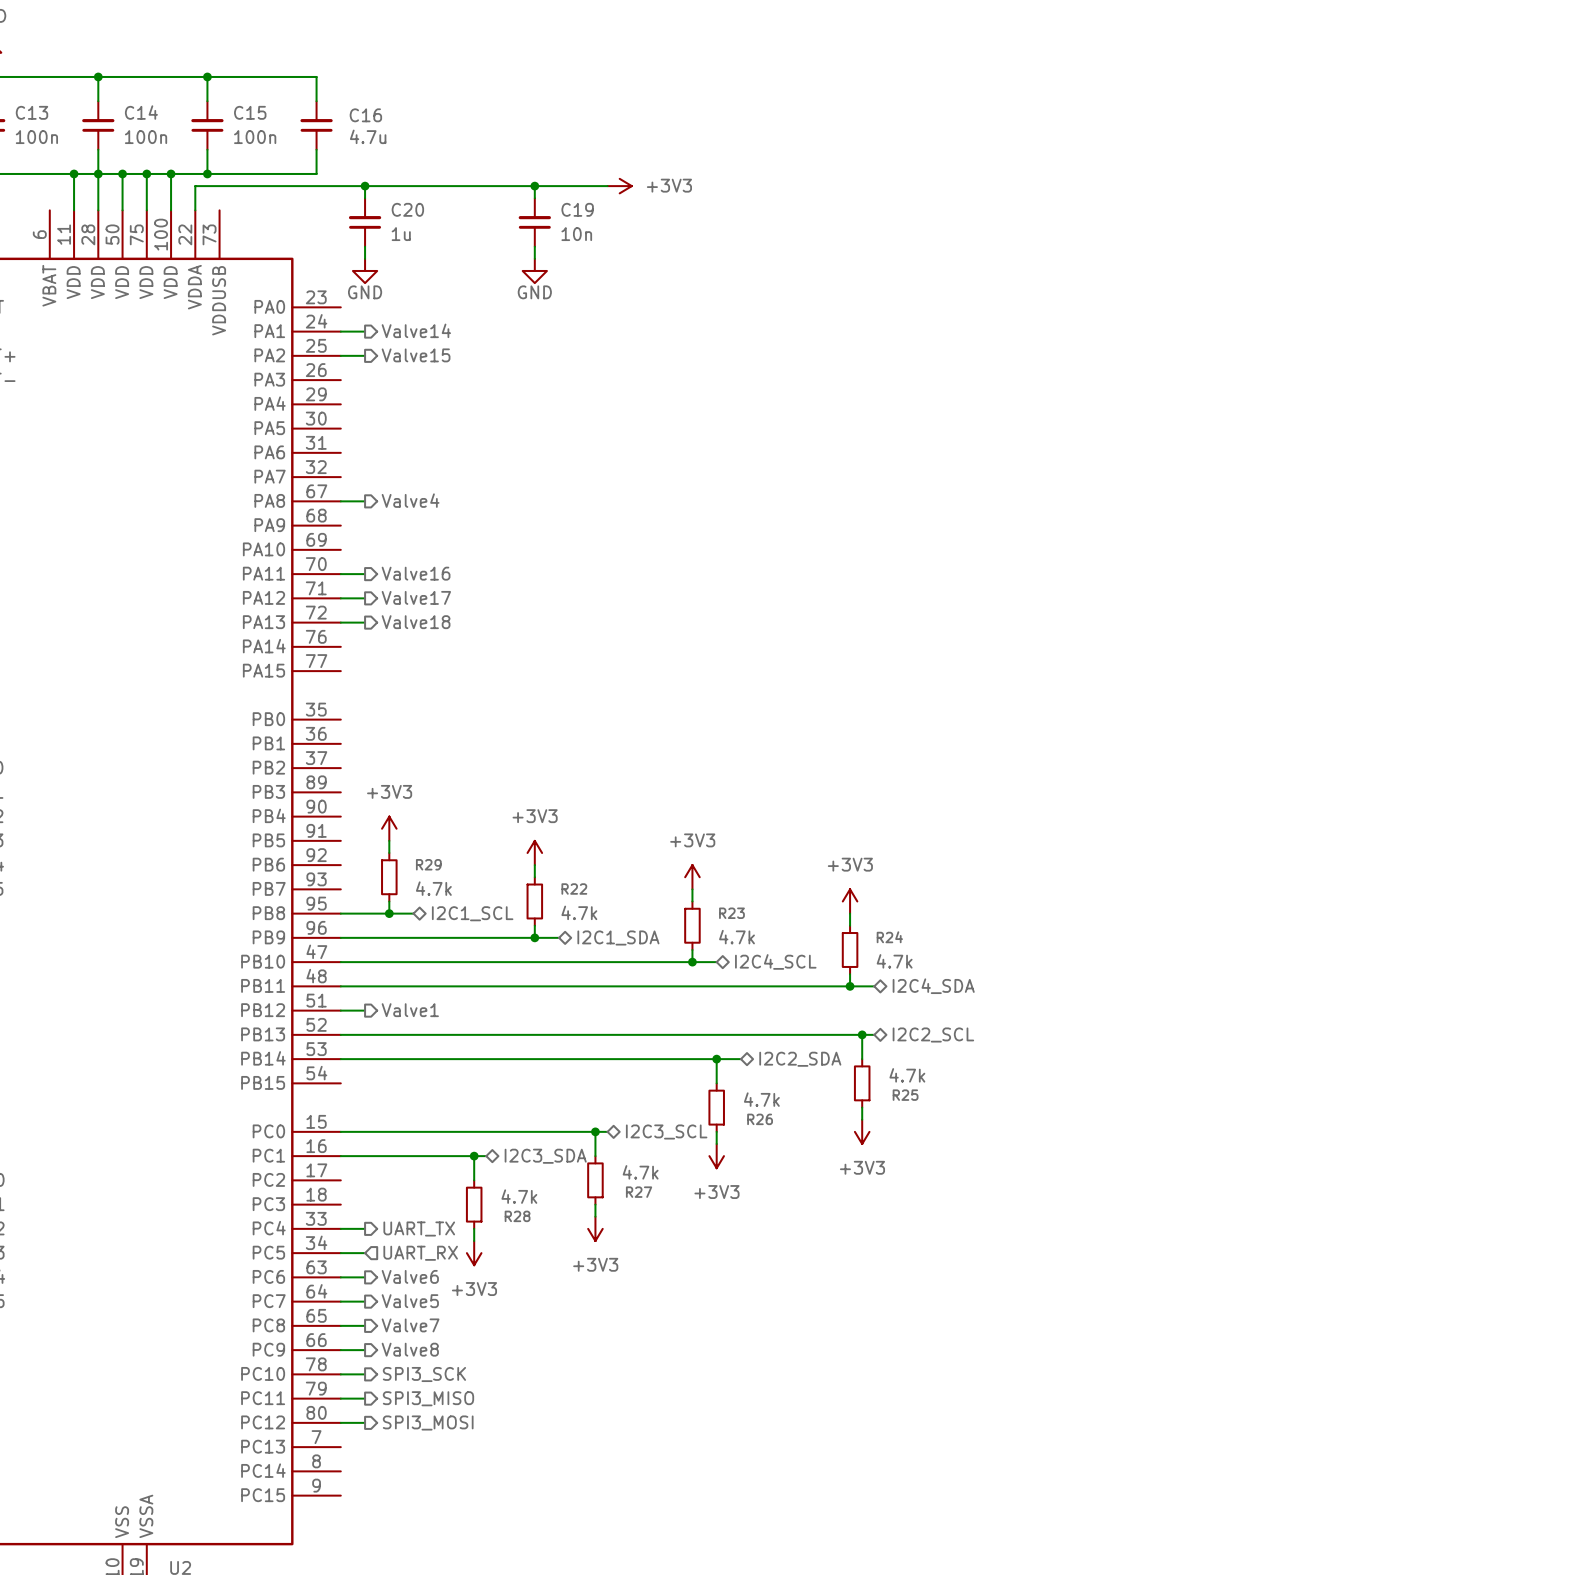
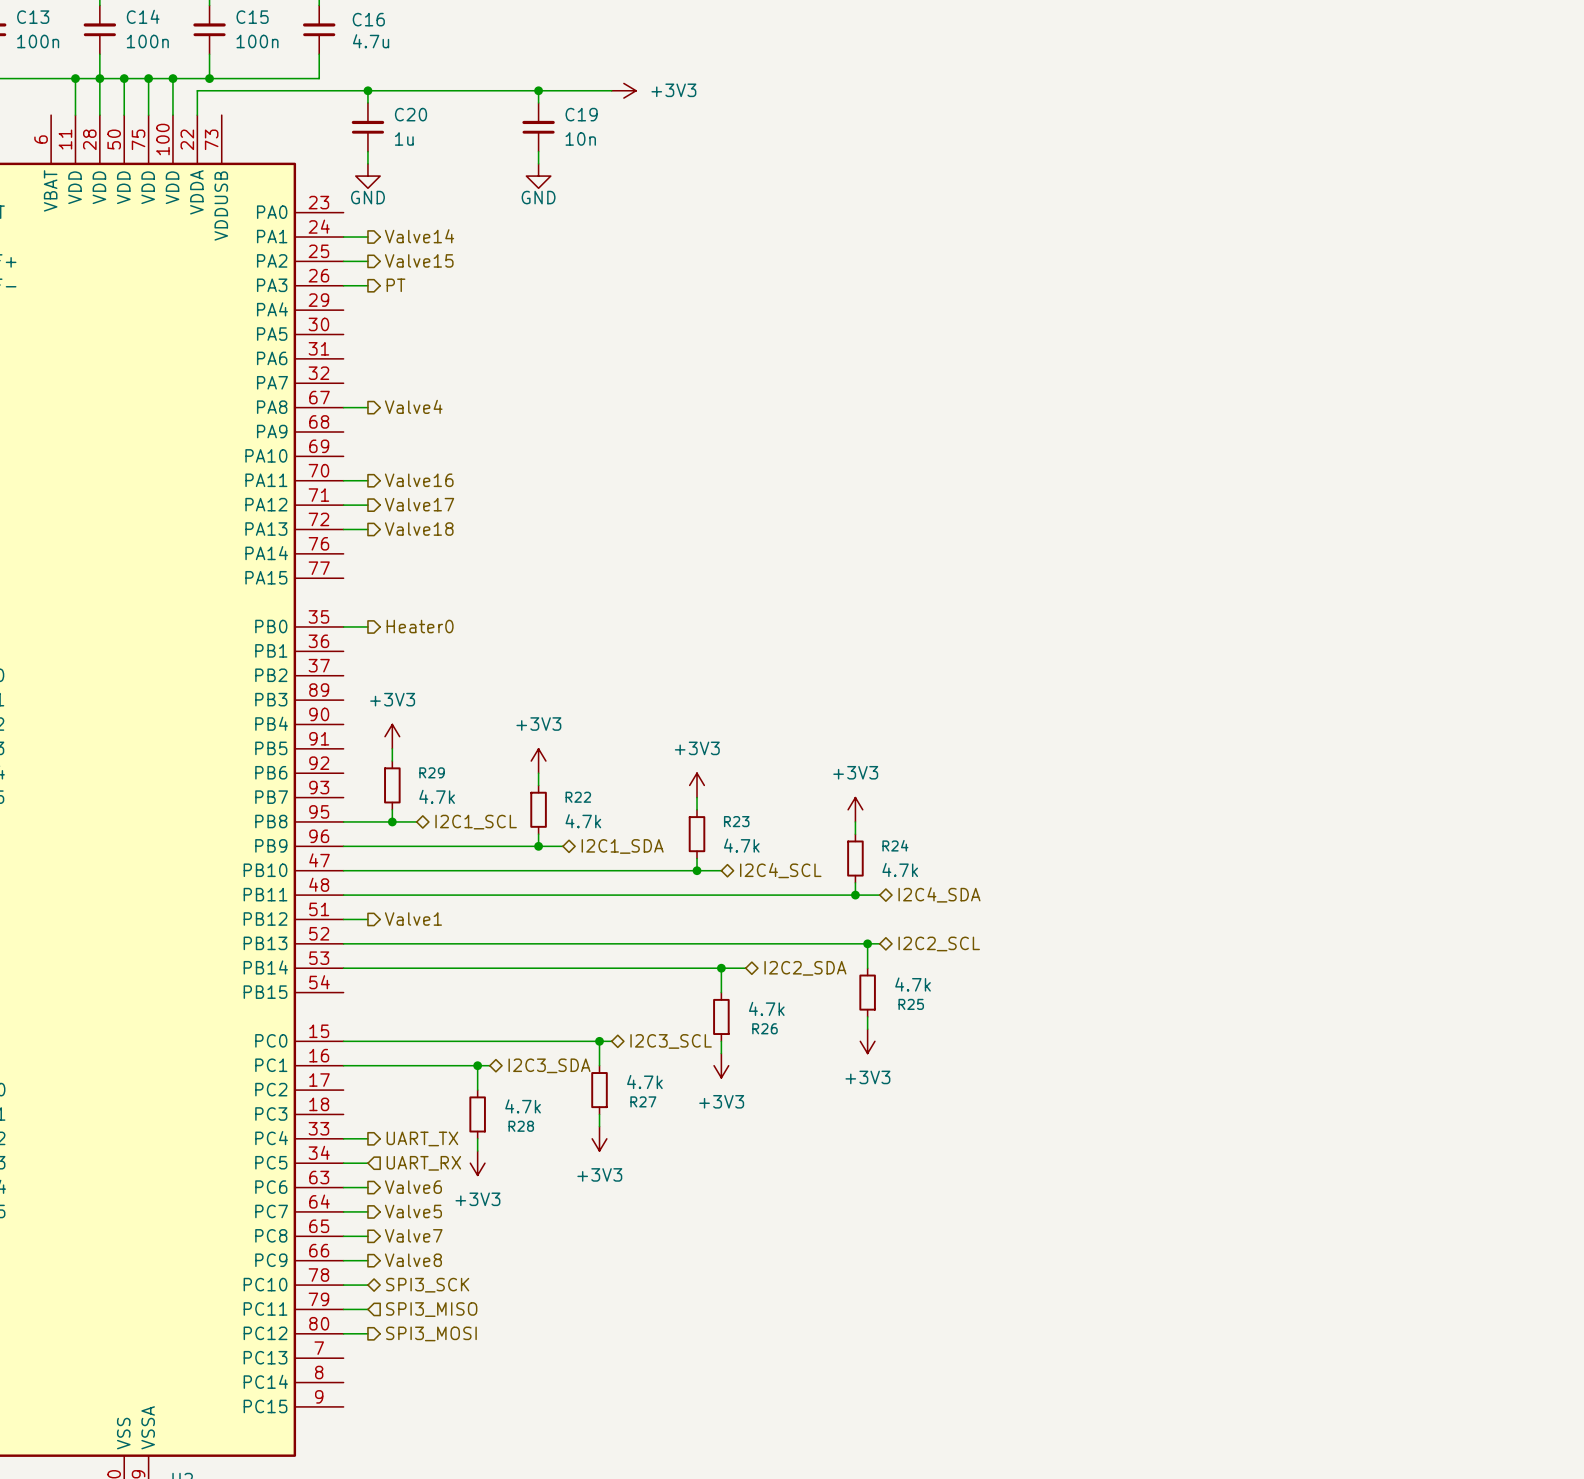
hierarchical label: none -> PT (396, 285)
wire: none -> (343, 285) (367, 285)
wire: none -> (343, 626) (367, 626)
hierarchical label: none -> Heater0 (420, 626)
hierarchical label shape: output (424, 1374) -> bidirectional (427, 1285)
hierarchical label shape: output (428, 1398) -> input (431, 1309)

